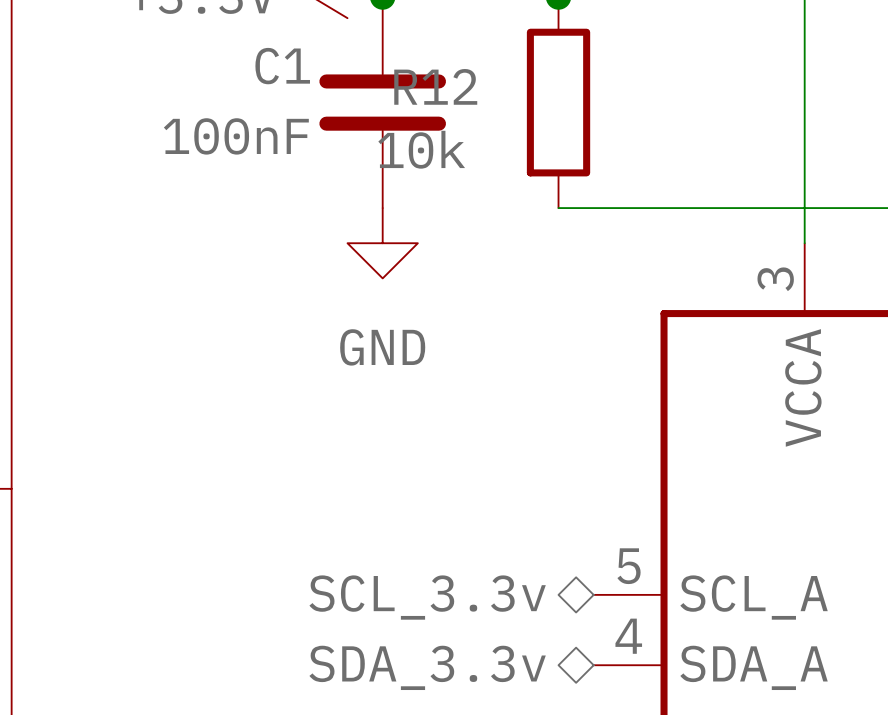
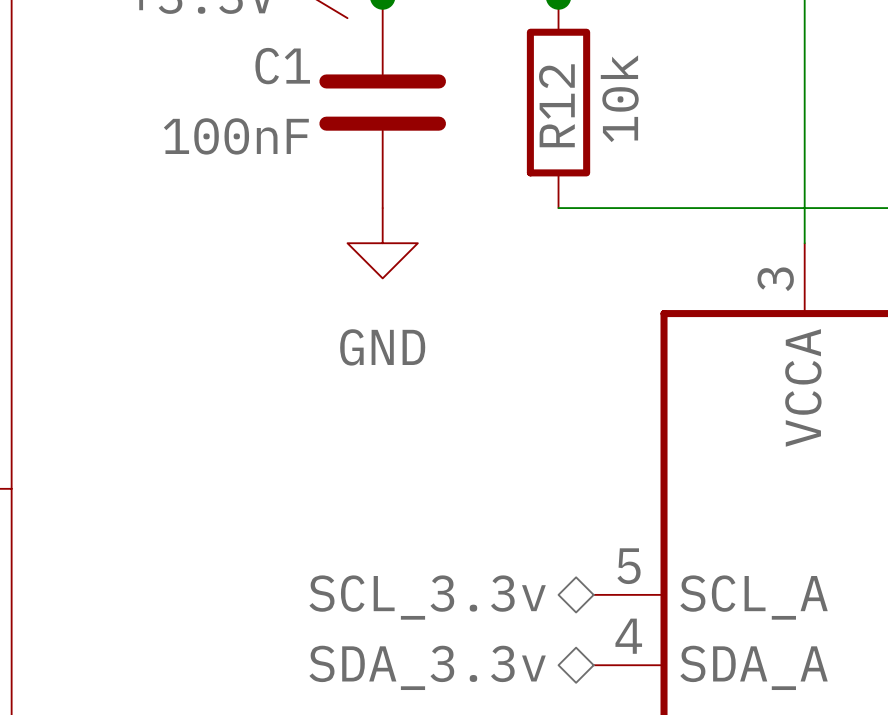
R12 name rotation: 0° (435, 86) -> 90° counterclockwise (556, 105)
R12 value rotation: 0° (421, 149) -> 90° counterclockwise (619, 98)
R12 value position: 10k (421, 149) -> 10k (619, 98)

